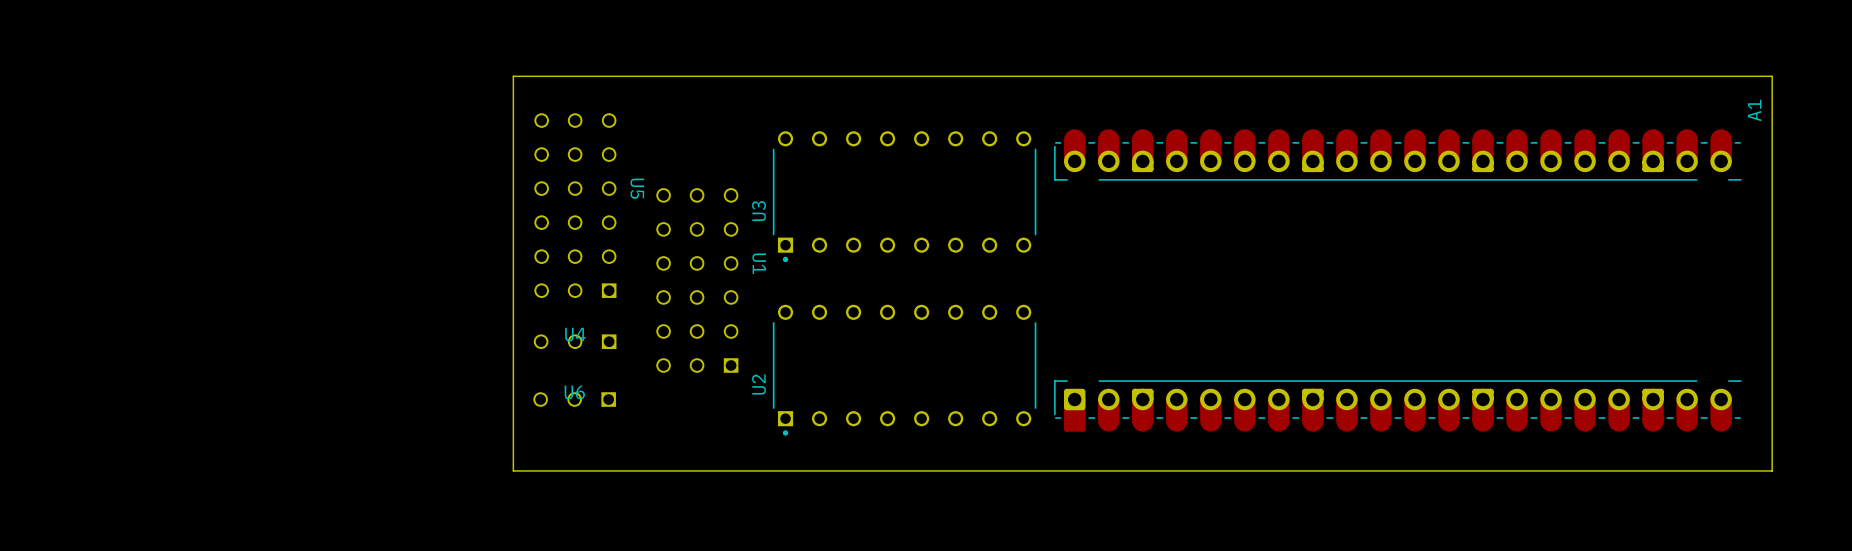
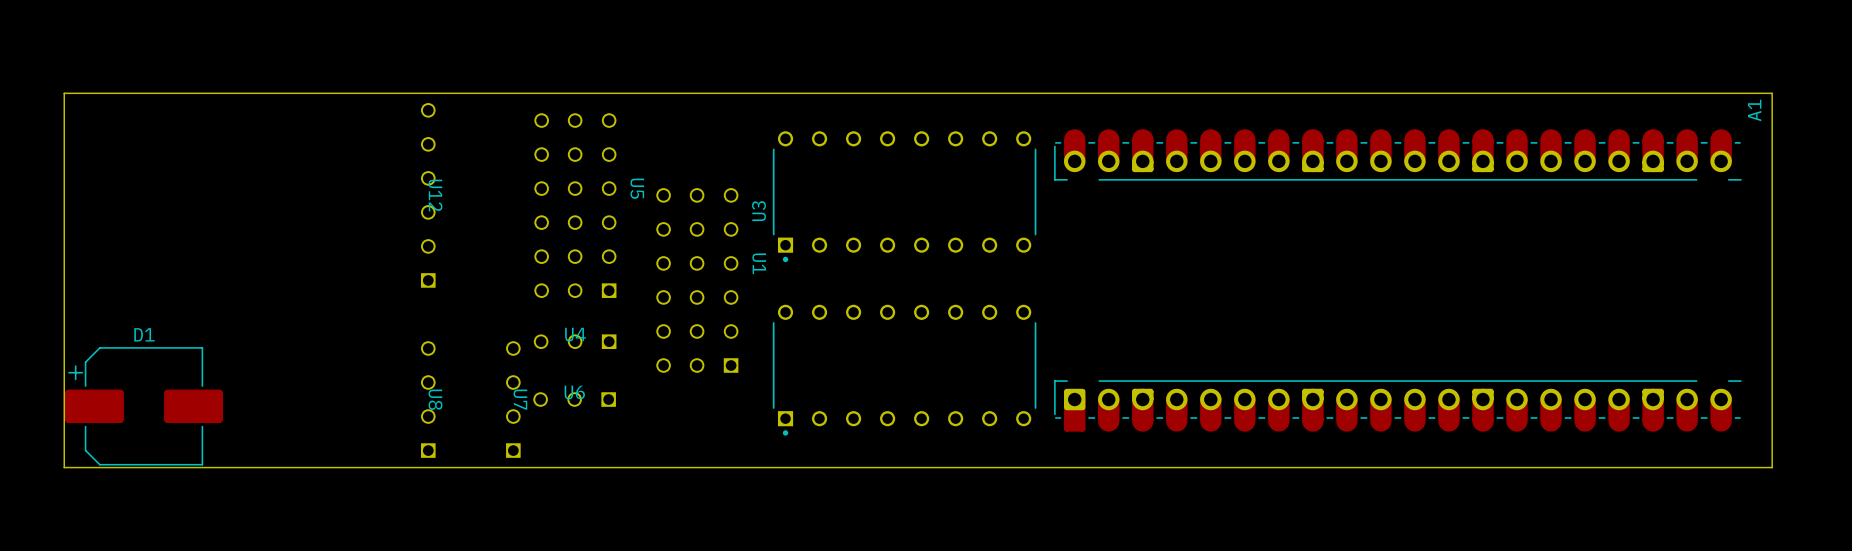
board edge: (1772, 93) (1772, 76) (513, 76) (513, 470) (1772, 470) (1772, 467) -> (1772, 93) (64, 93) (64, 467) (1772, 467)
U12: none -> (428, 195)
U2 name: U2 (758, 384) -> none
U8: none -> (428, 399)
U7: none -> (513, 399)
D1: none -> (143, 406)

